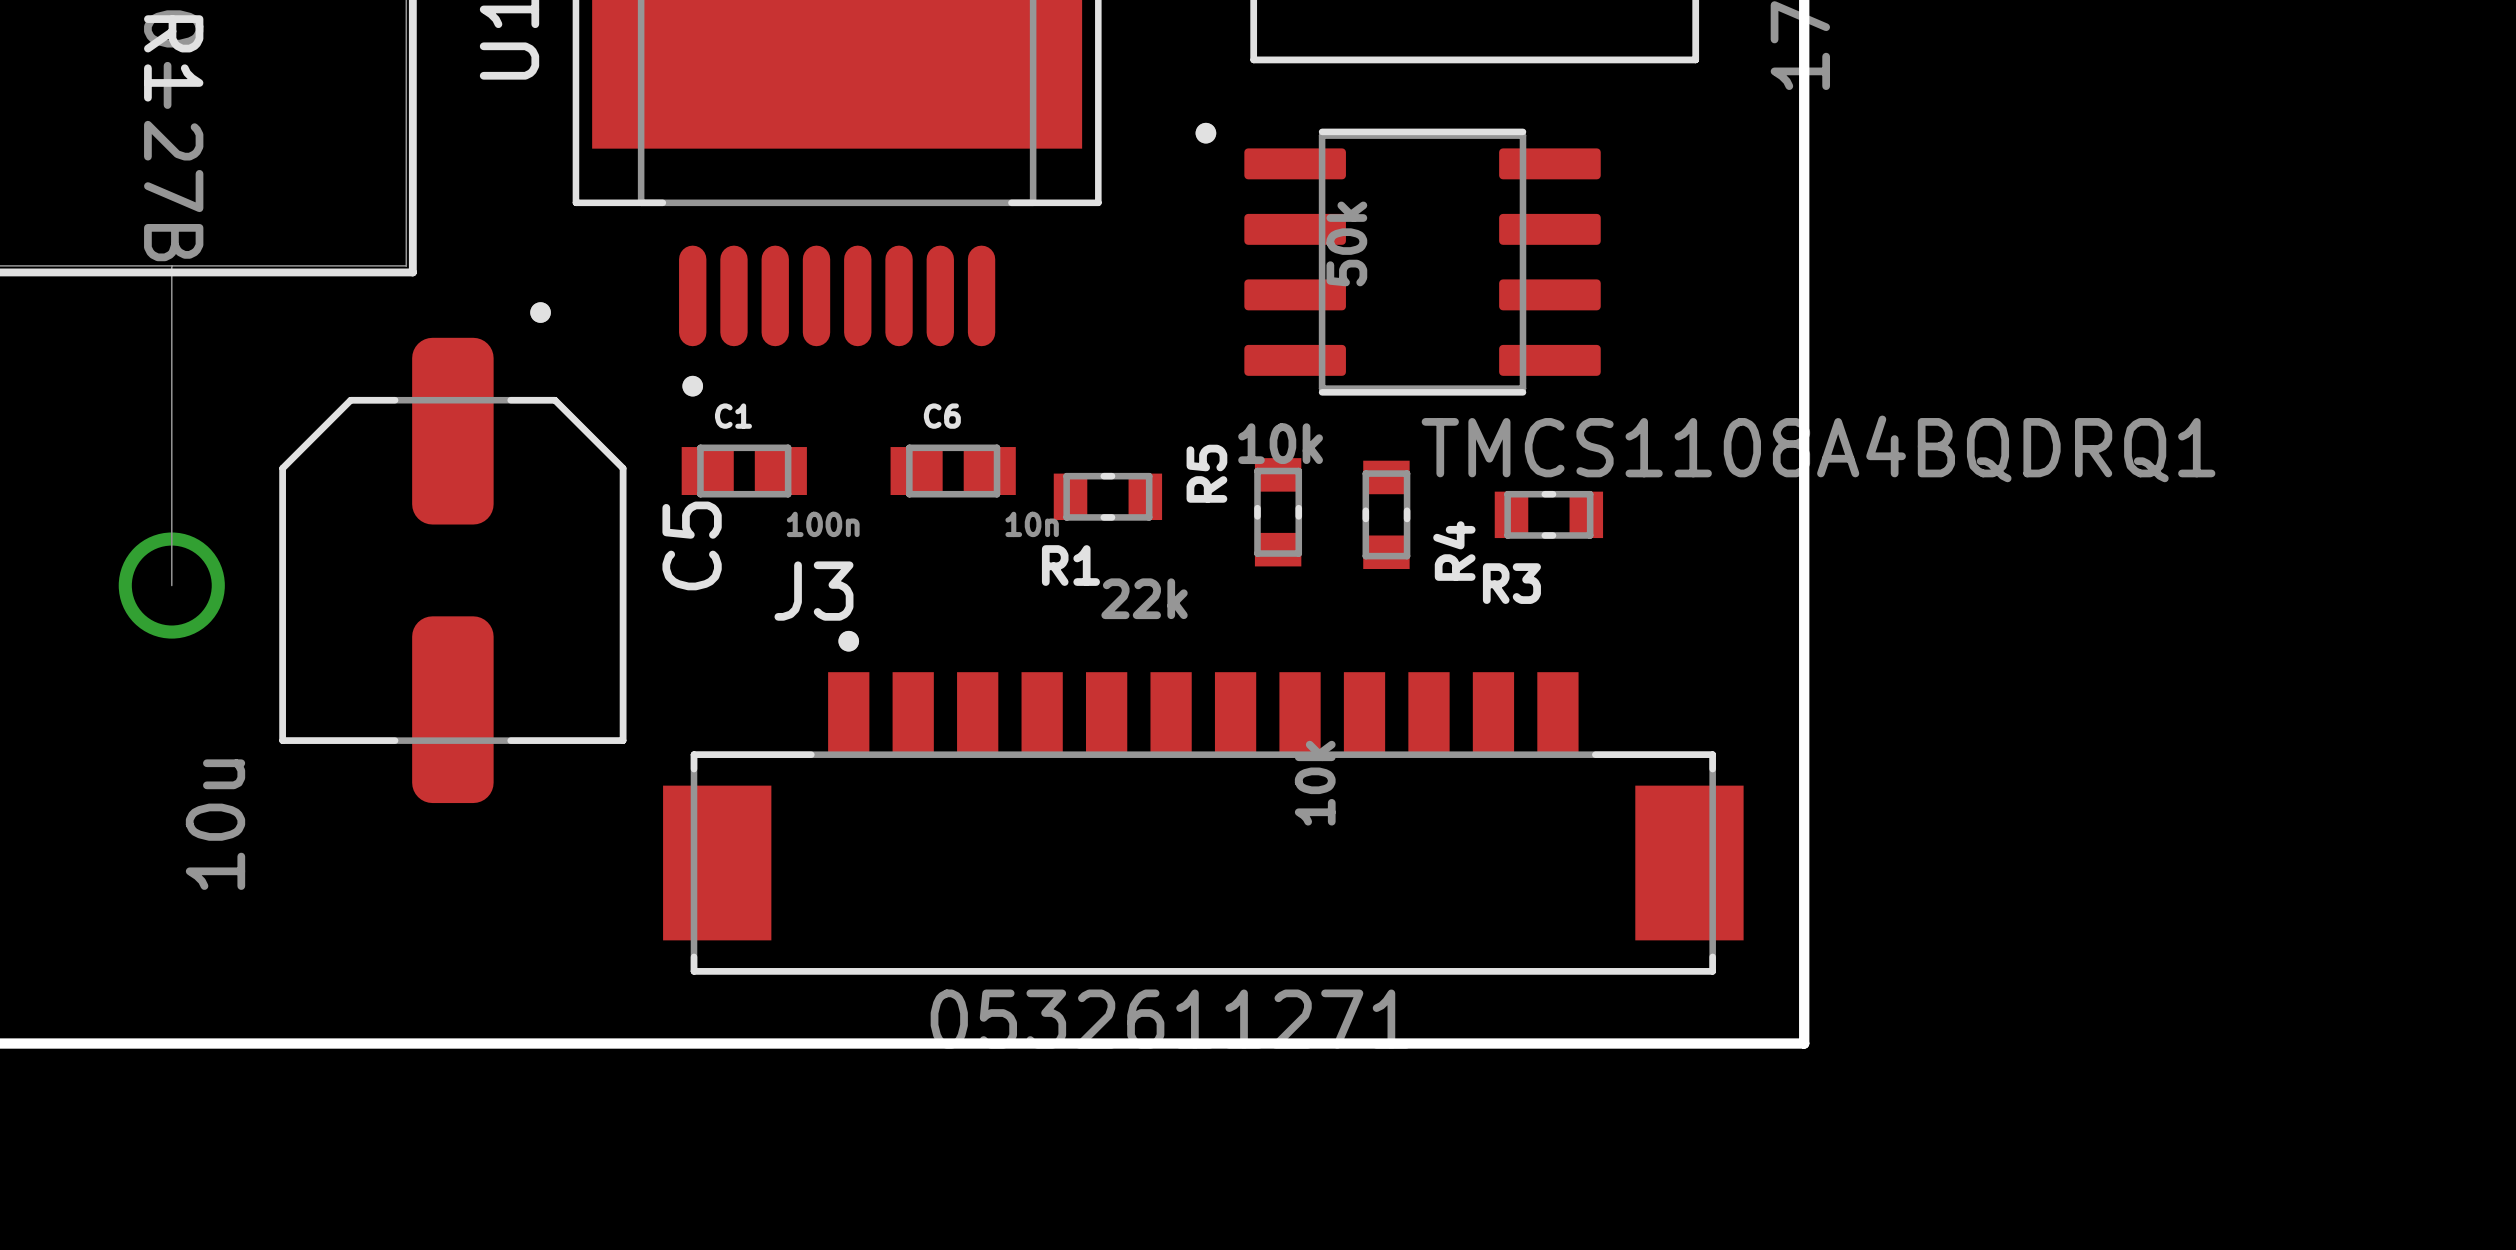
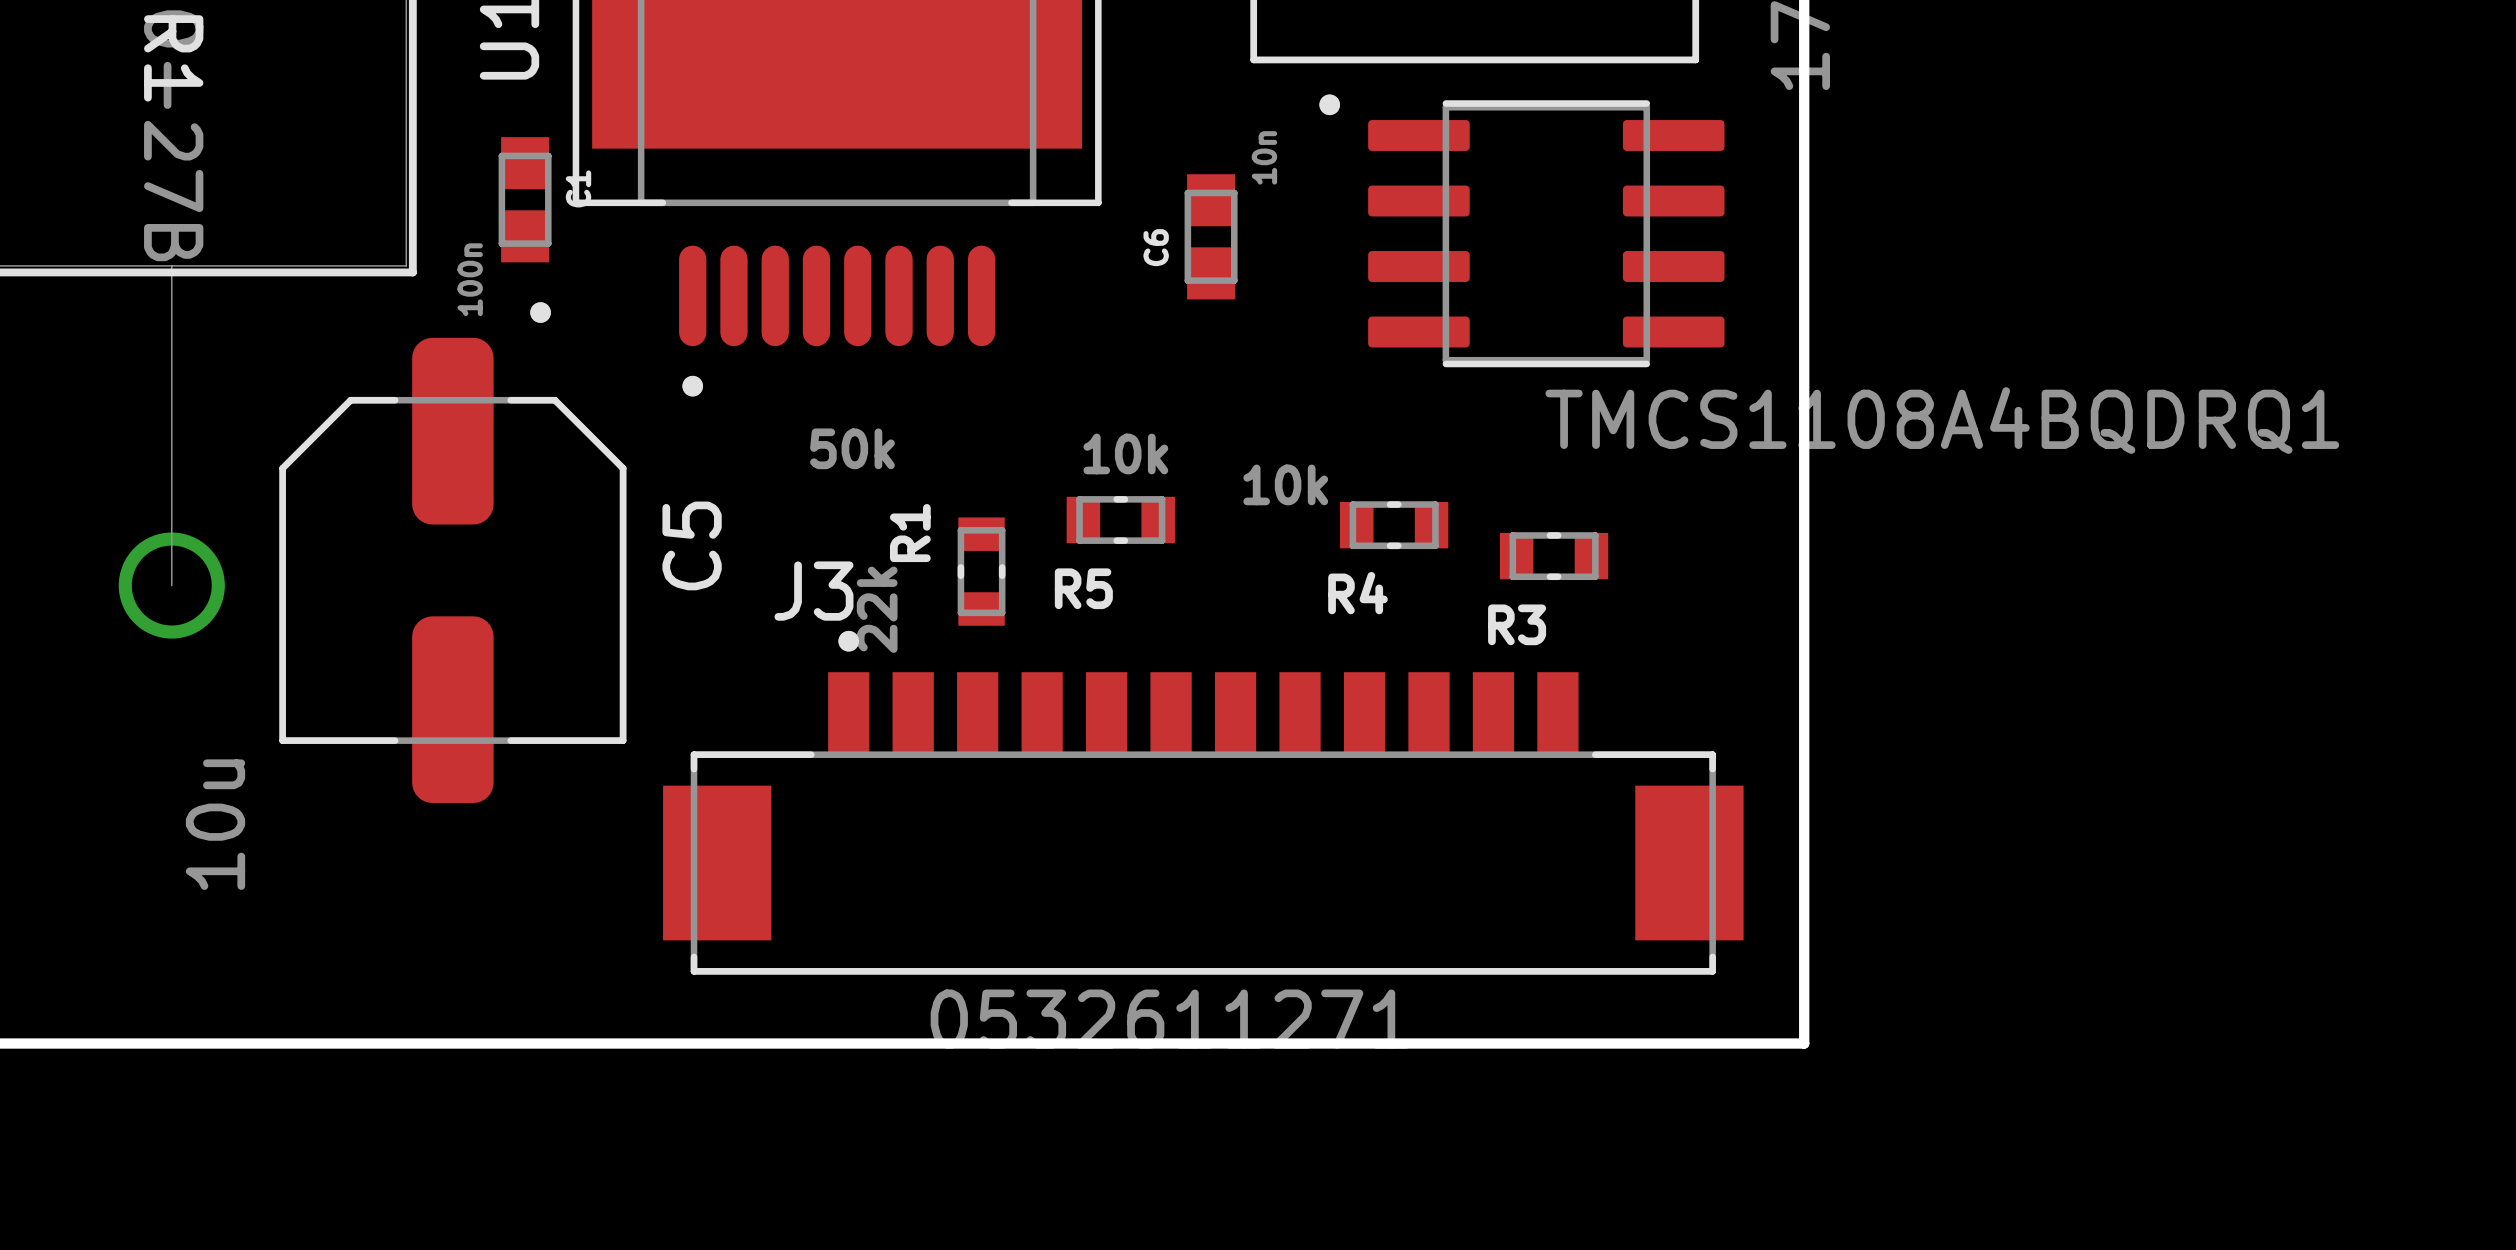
R5 value position: 50k (1346, 243) -> 50k (852, 448)
part position: (1398, 259) -> (1521, 230)
C1 rotation: 0° (744, 471) -> 90° clockwise (525, 199)
C1 position: (744, 471) -> (525, 199)
C6 rotation: 0° (953, 471) -> 90° clockwise (1211, 236)
C6 position: (953, 471) -> (1211, 236)
R5 name position: R5 (1206, 473) -> R5 (1083, 588)
R1 rotation: 0° (1107, 496) -> 90° clockwise (981, 571)
R1 position: (1107, 496) -> (981, 571)
R5 rotation: 0° (1278, 512) -> 90° clockwise (1120, 520)
R5 position: (1278, 512) -> (1120, 520)
R4 rotation: 0° (1386, 514) -> 90° clockwise (1394, 525)
R3 position: (1548, 514) -> (1554, 556)
C6 value position: 10n (1032, 524) -> 10n (1264, 157)

